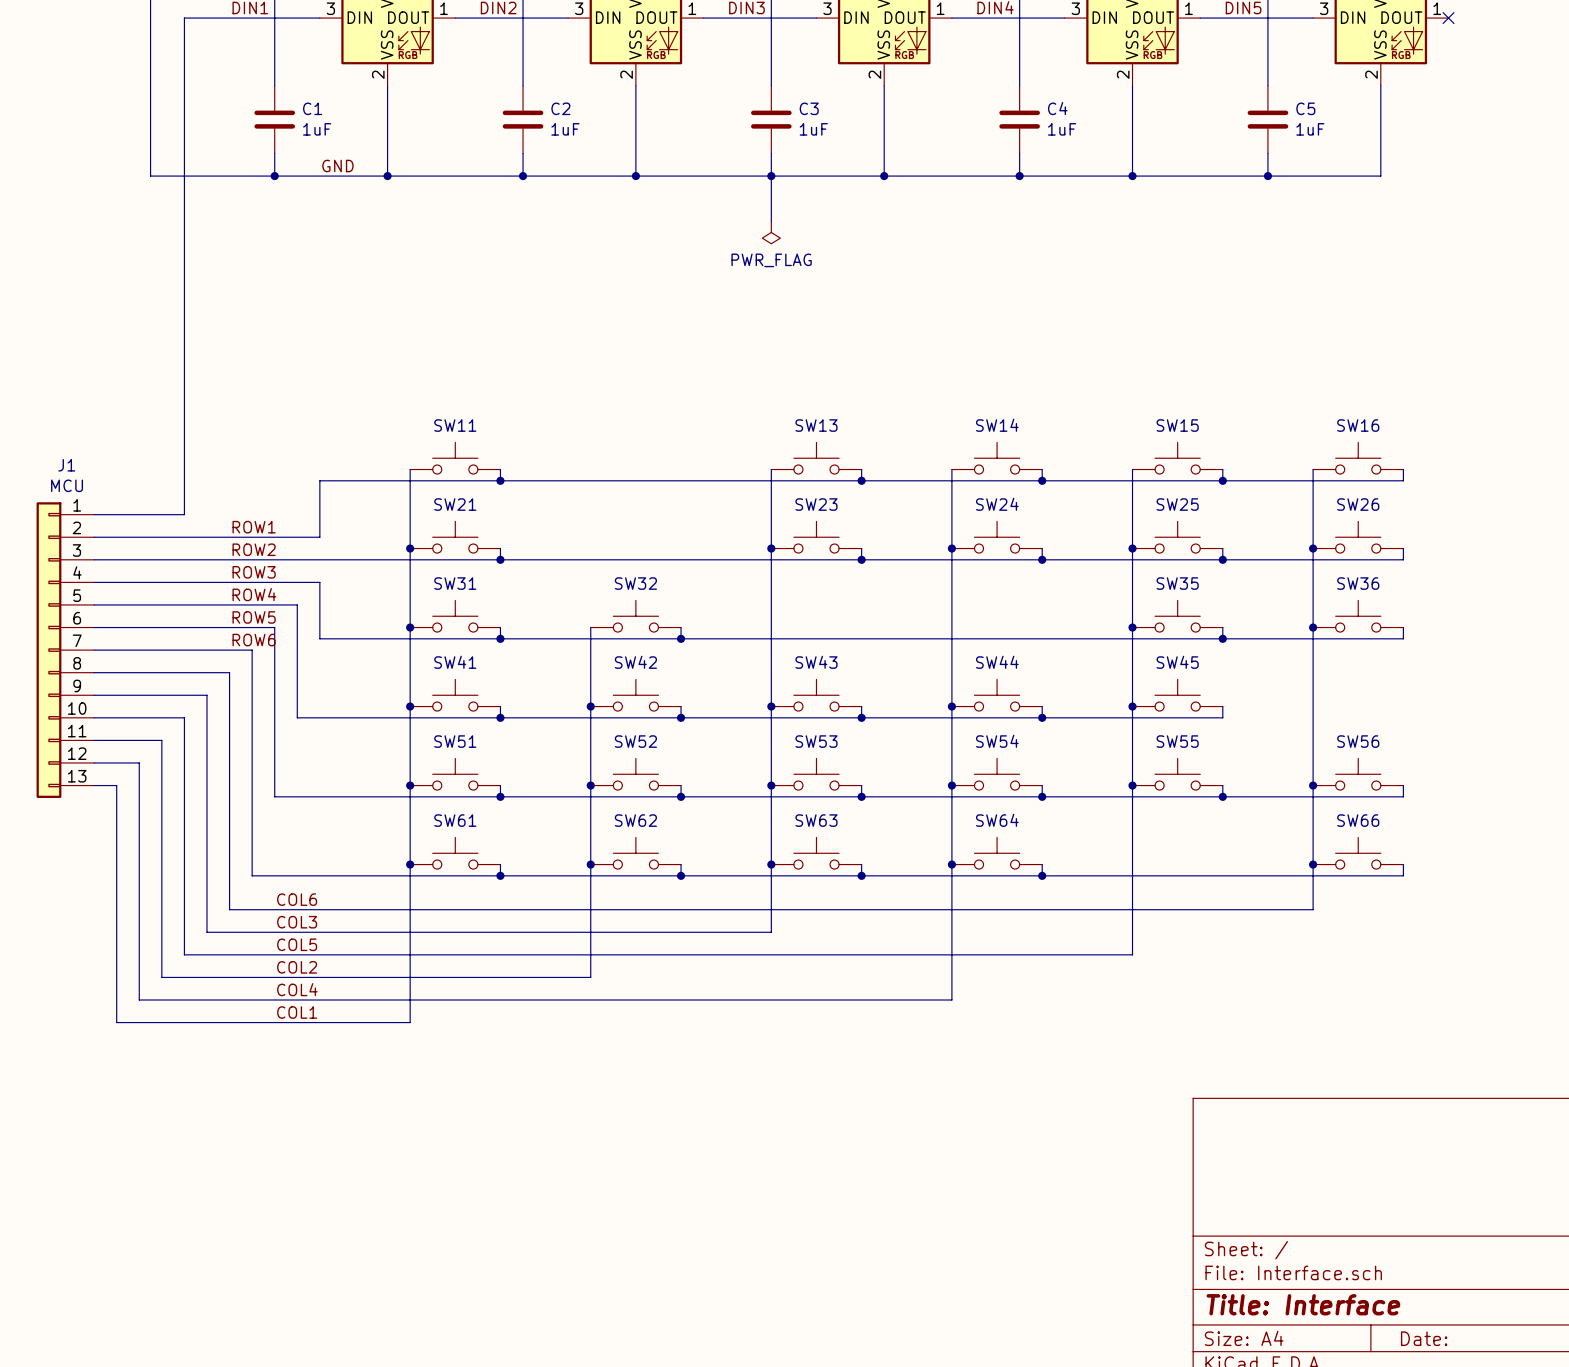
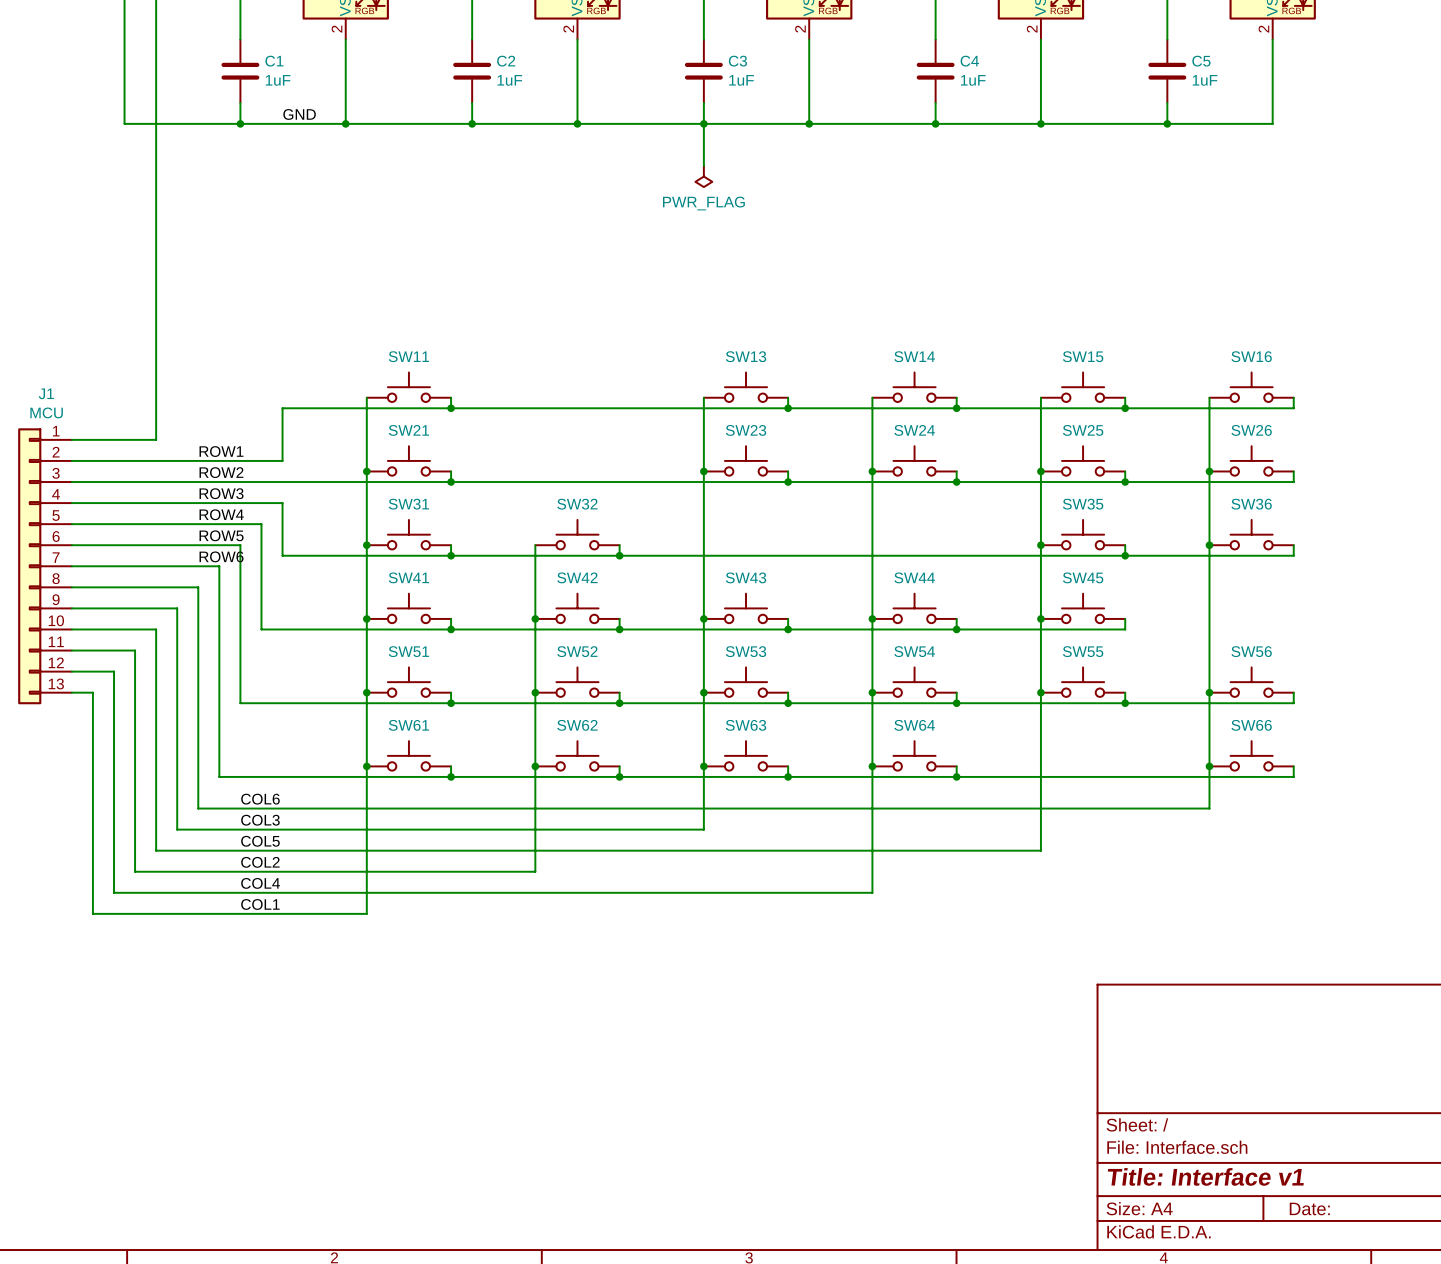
title block: Title: Interface (1303, 1304) -> Title: Interface v1 (1205, 1176)

